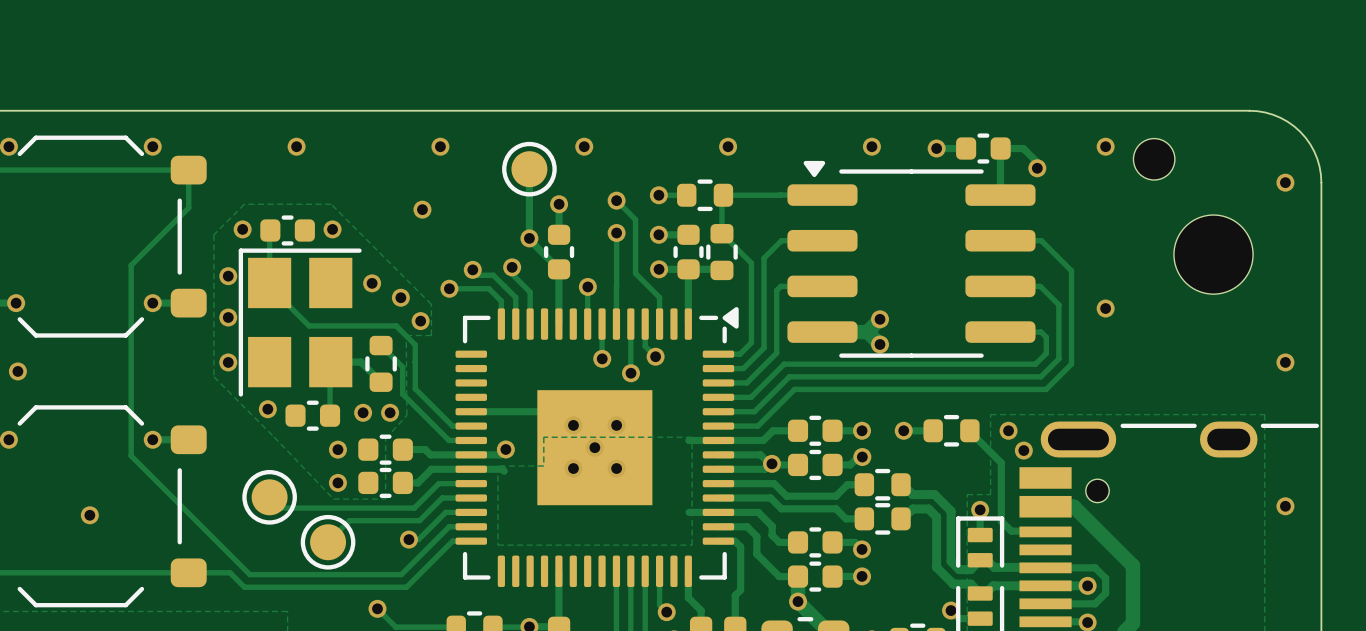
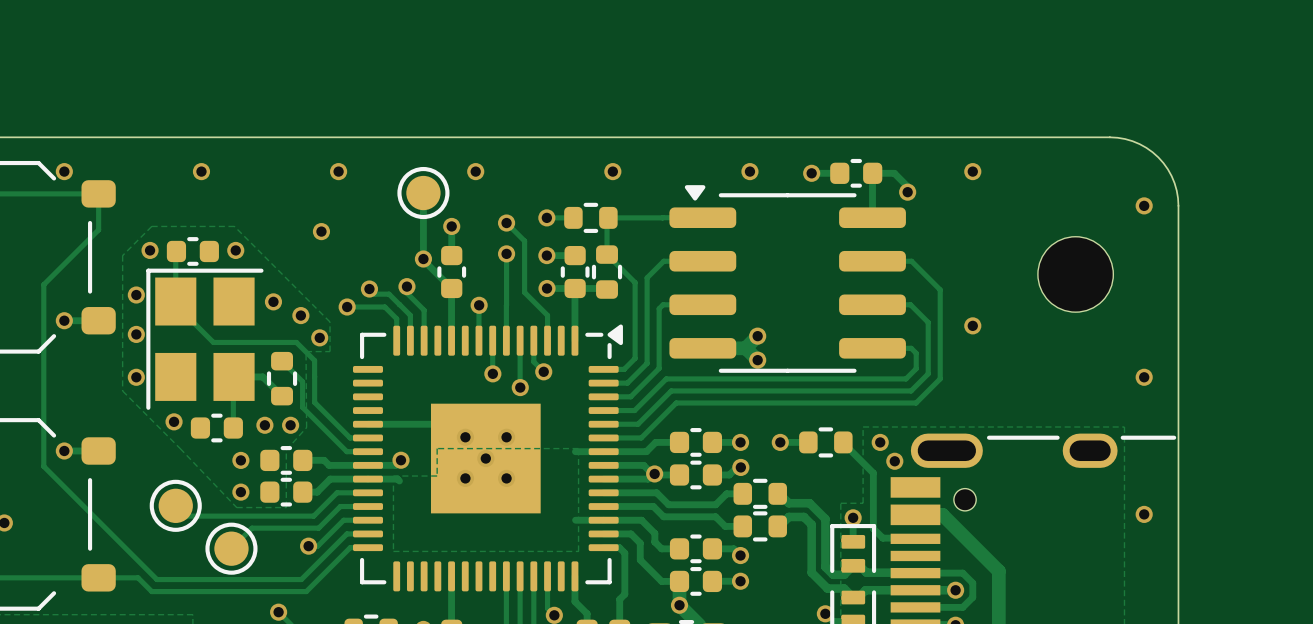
part: (1154, 159) -> none

